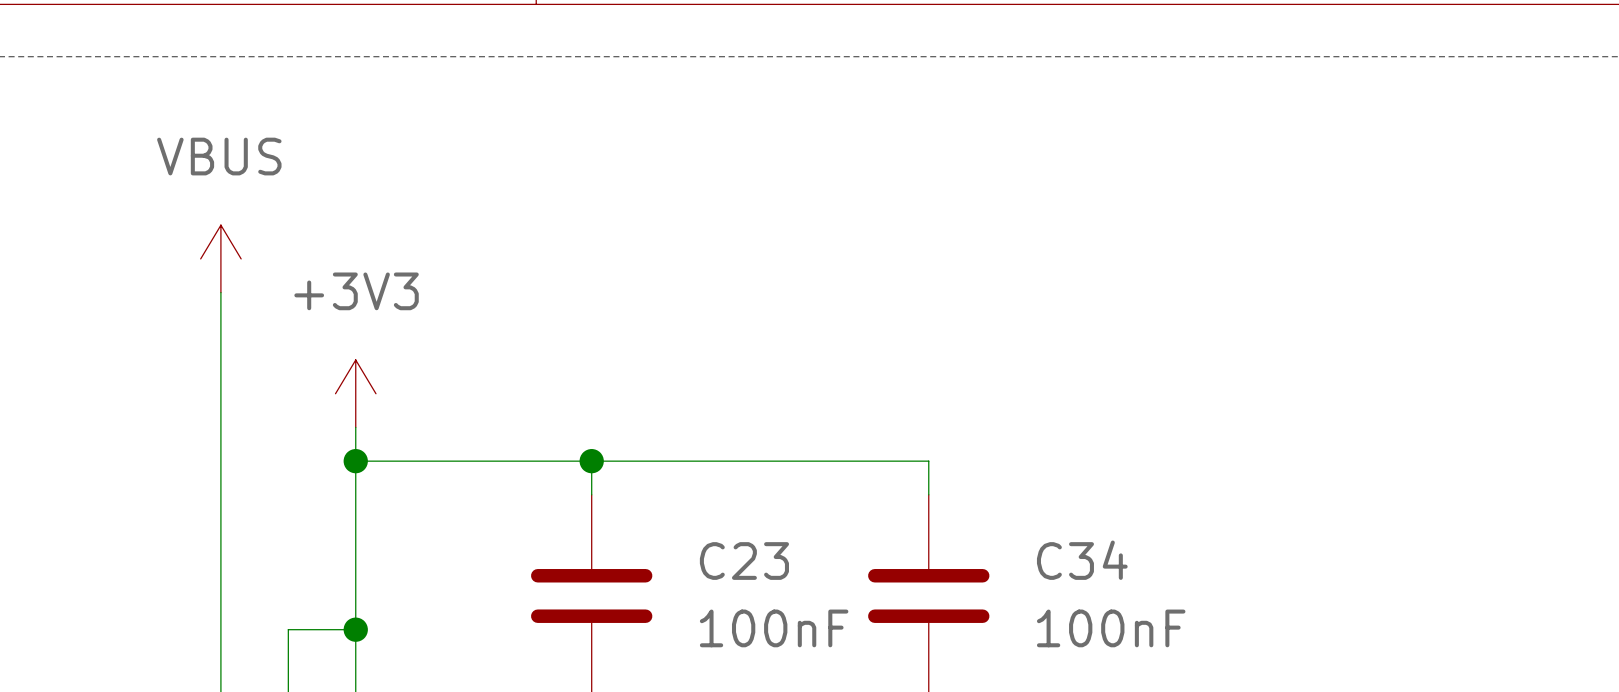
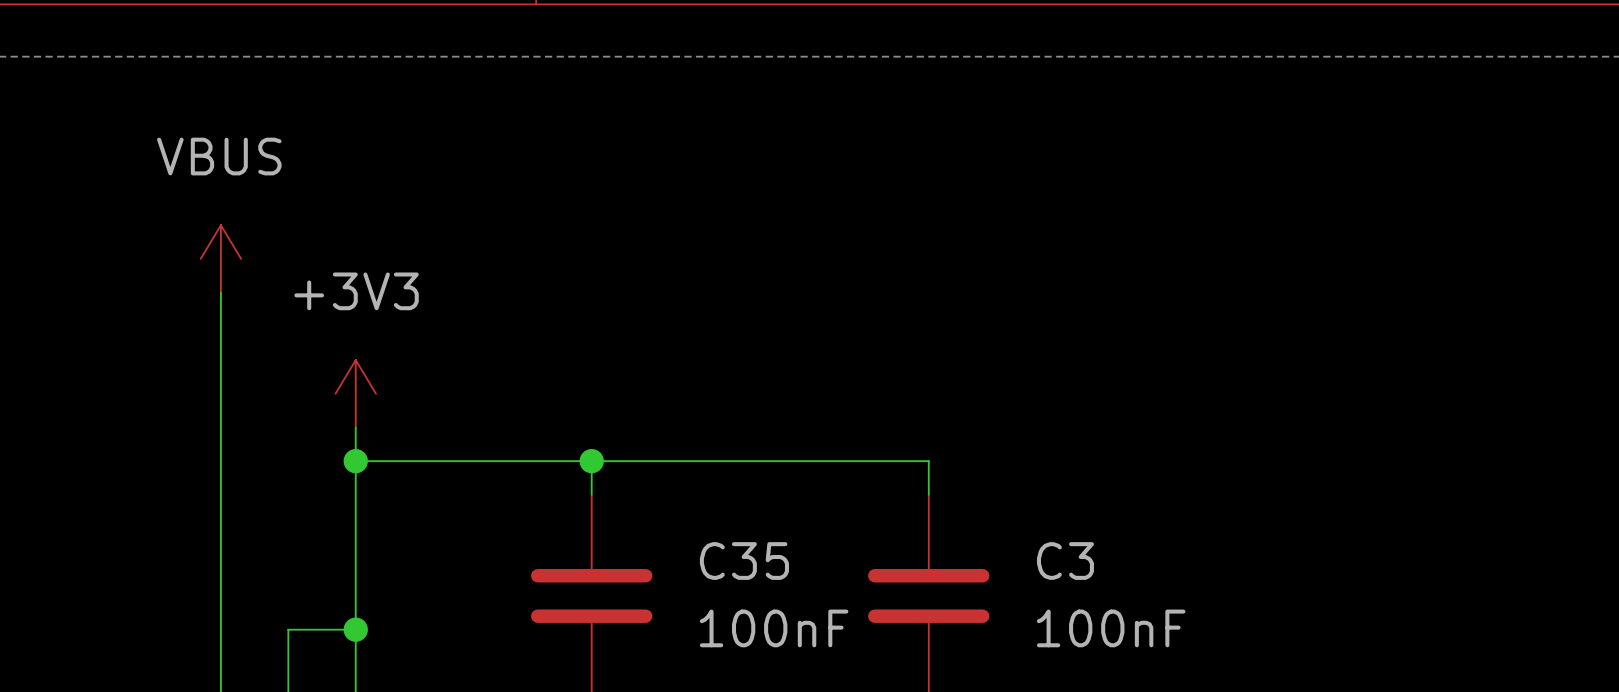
C34 name: C34 (1082, 560) -> C3 (1065, 561)
C23 name: C23 (744, 561) -> C35 (744, 561)

